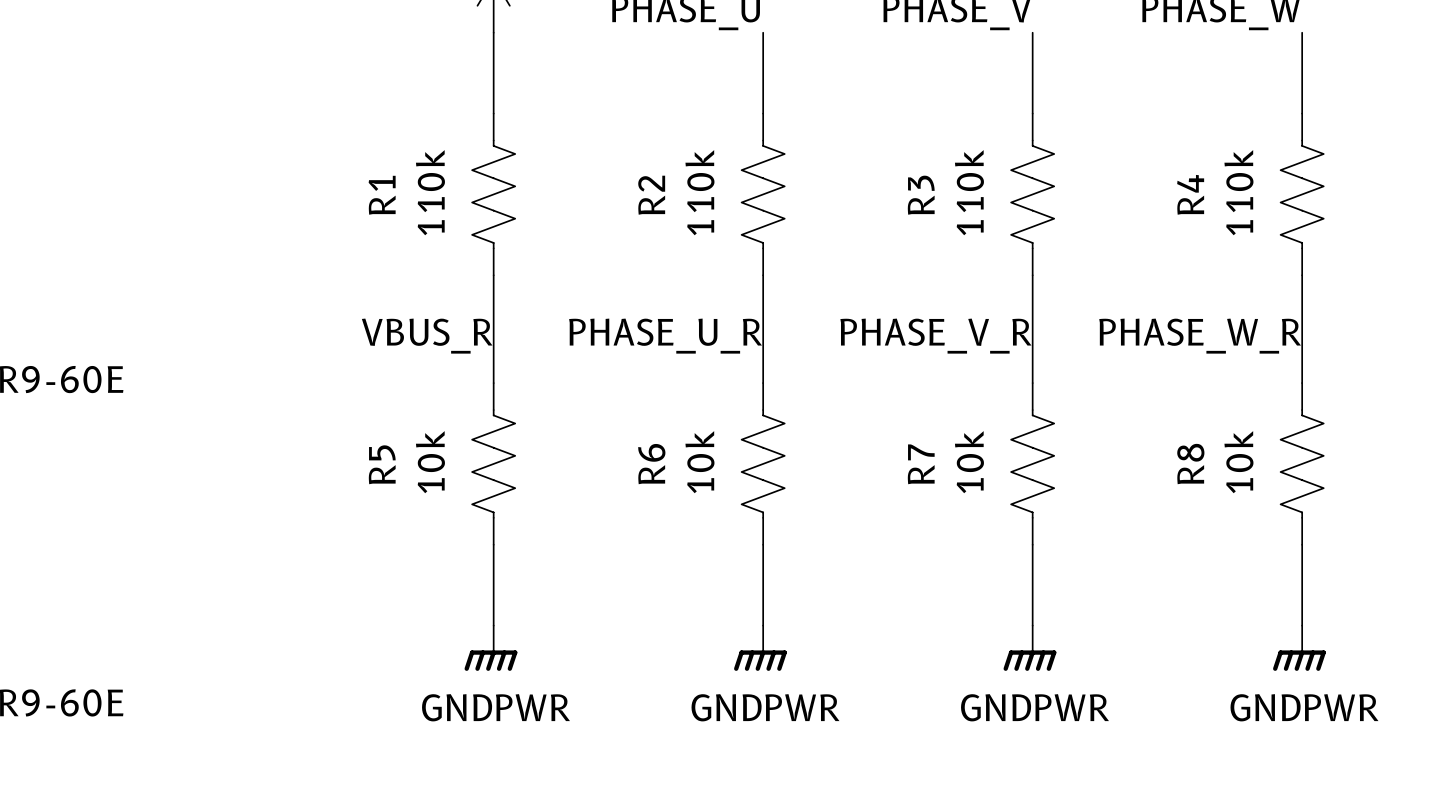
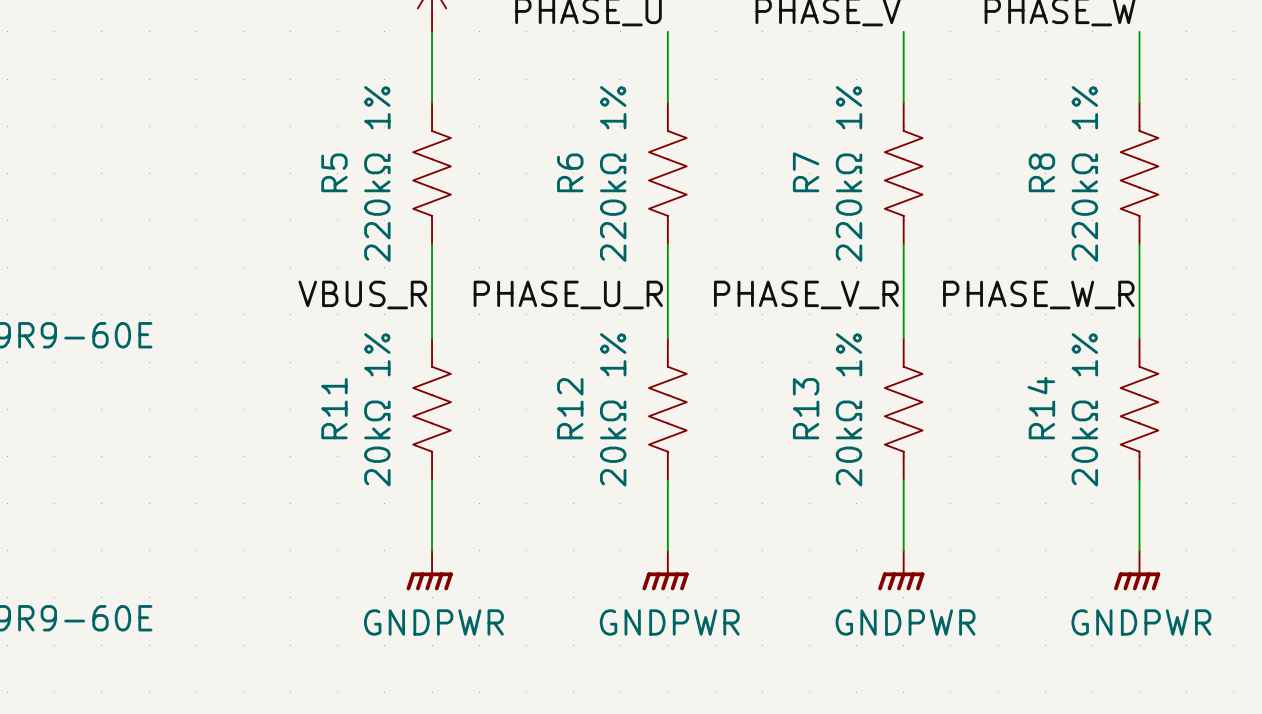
R1 value: 110k (430, 192) -> 220kΩ 1% (377, 173)
R2 value: 110k (699, 192) -> 220kΩ 1% (613, 173)
R3 value: 110k (969, 192) -> 220kΩ 1% (849, 173)
R4 value: 110k (1238, 192) -> 220kΩ 1% (1084, 173)
R4 name: R4 (1190, 194) -> R8 (1041, 172)
R1 name: R1 (382, 195) -> R5 (334, 172)
R2 name: R2 (651, 195) -> R6 (570, 172)
R3 name: R3 (921, 195) -> R7 (806, 172)
R5 value: 10k (430, 462) -> 20kΩ 1% (377, 409)
R6 value: 10k (699, 462) -> 20kΩ 1% (613, 409)
R7 value: 10k (969, 462) -> 20kΩ 1% (849, 409)
R8 value: 10k (1238, 462) -> 20kΩ 1% (1084, 409)
R5 name: R5 (382, 464) -> R11 (334, 408)
R6 name: R6 (651, 464) -> R12 (570, 408)
R7 name: R7 (921, 464) -> R13 (806, 408)
R8 name: R8 (1190, 464) -> R14 (1041, 408)

